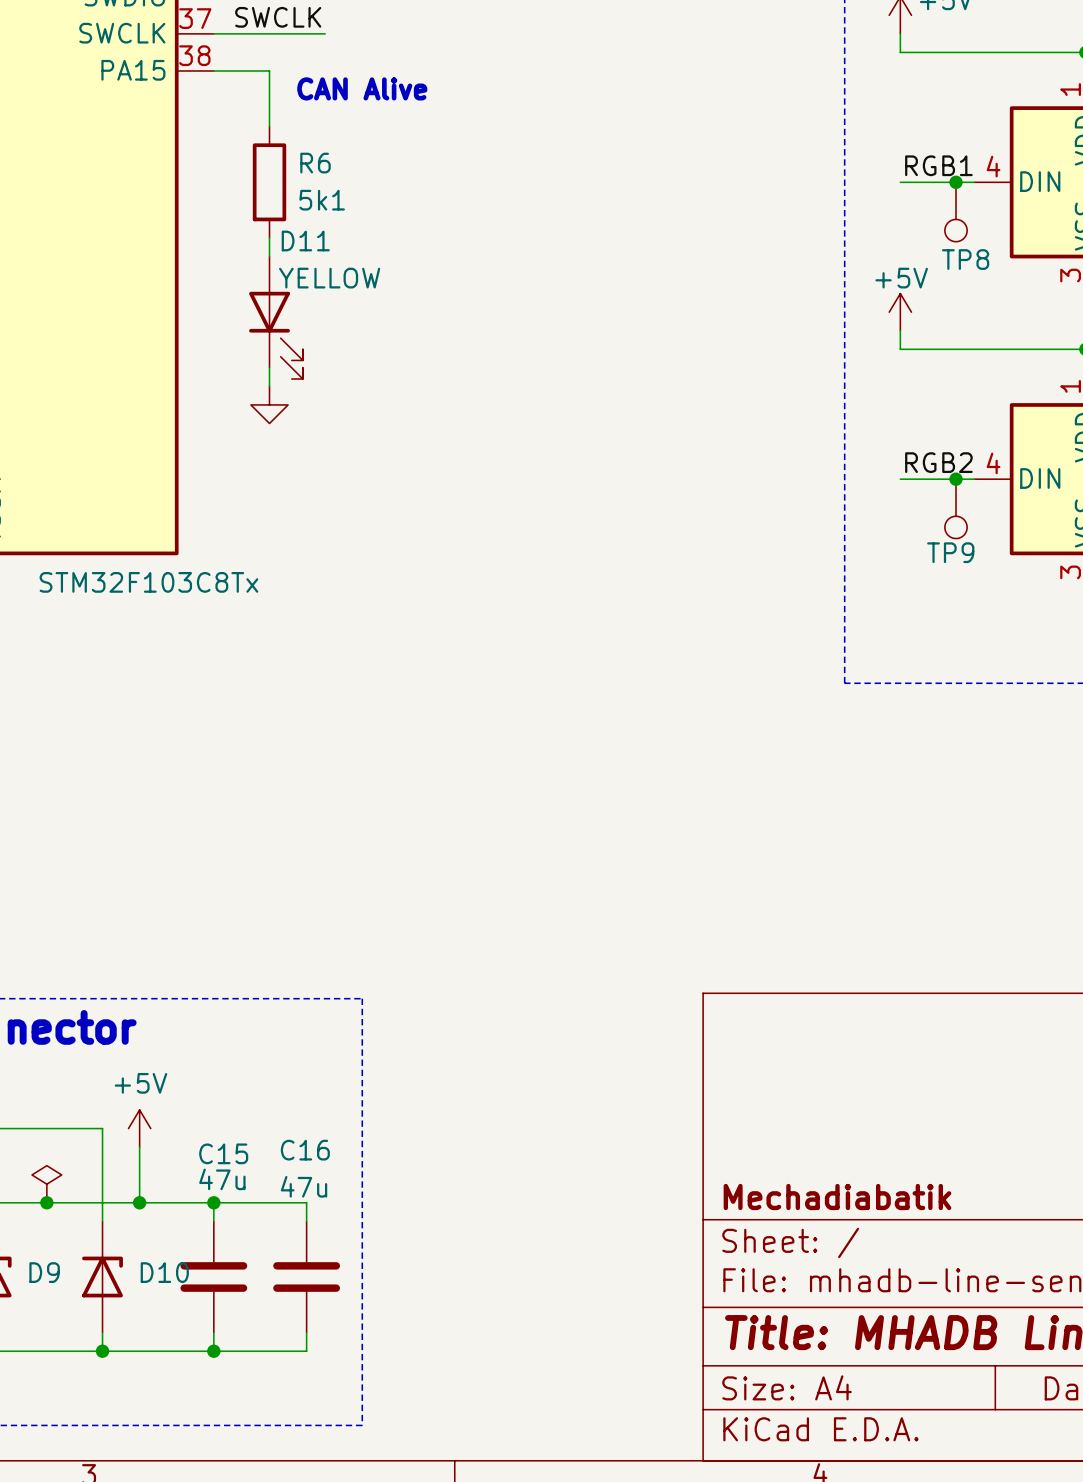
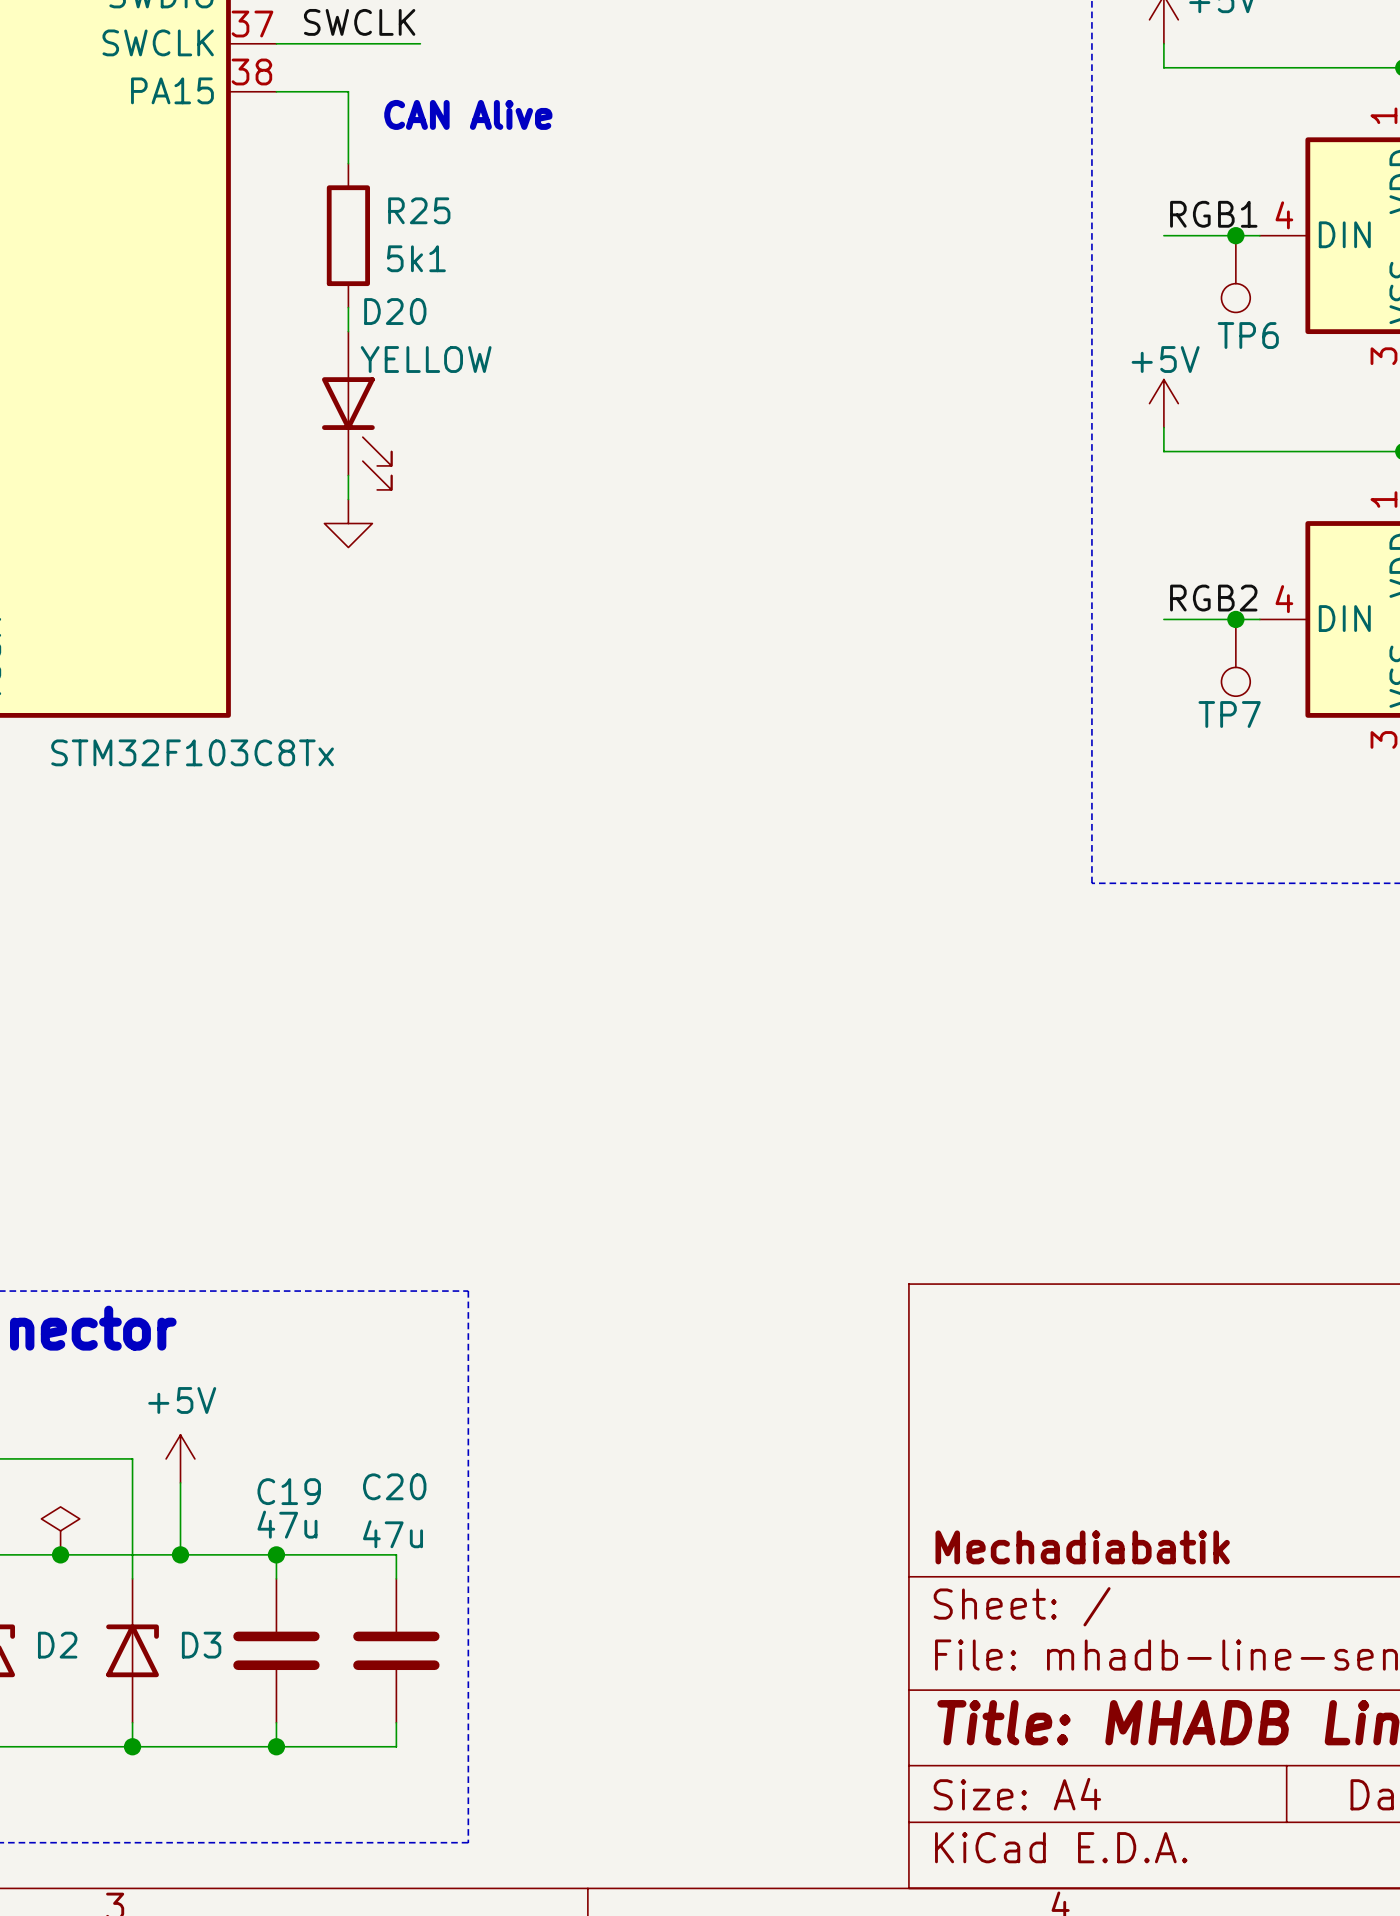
R6 name: R6 (315, 163) -> R25 (419, 210)
D11 name: D11 (305, 240) -> D20 (395, 311)
TP8 name: TP8 (965, 259) -> TP6 (1248, 335)
TP9 name: TP9 (950, 552) -> TP7 (1229, 714)
C16 name: C16 (305, 1150) -> C20 (394, 1486)
C15 name: C15 (223, 1153) -> C19 (289, 1491)
D9 name: D9 (44, 1272) -> D2 (57, 1645)
D10 name: D10 (164, 1272) -> D3 (201, 1645)

